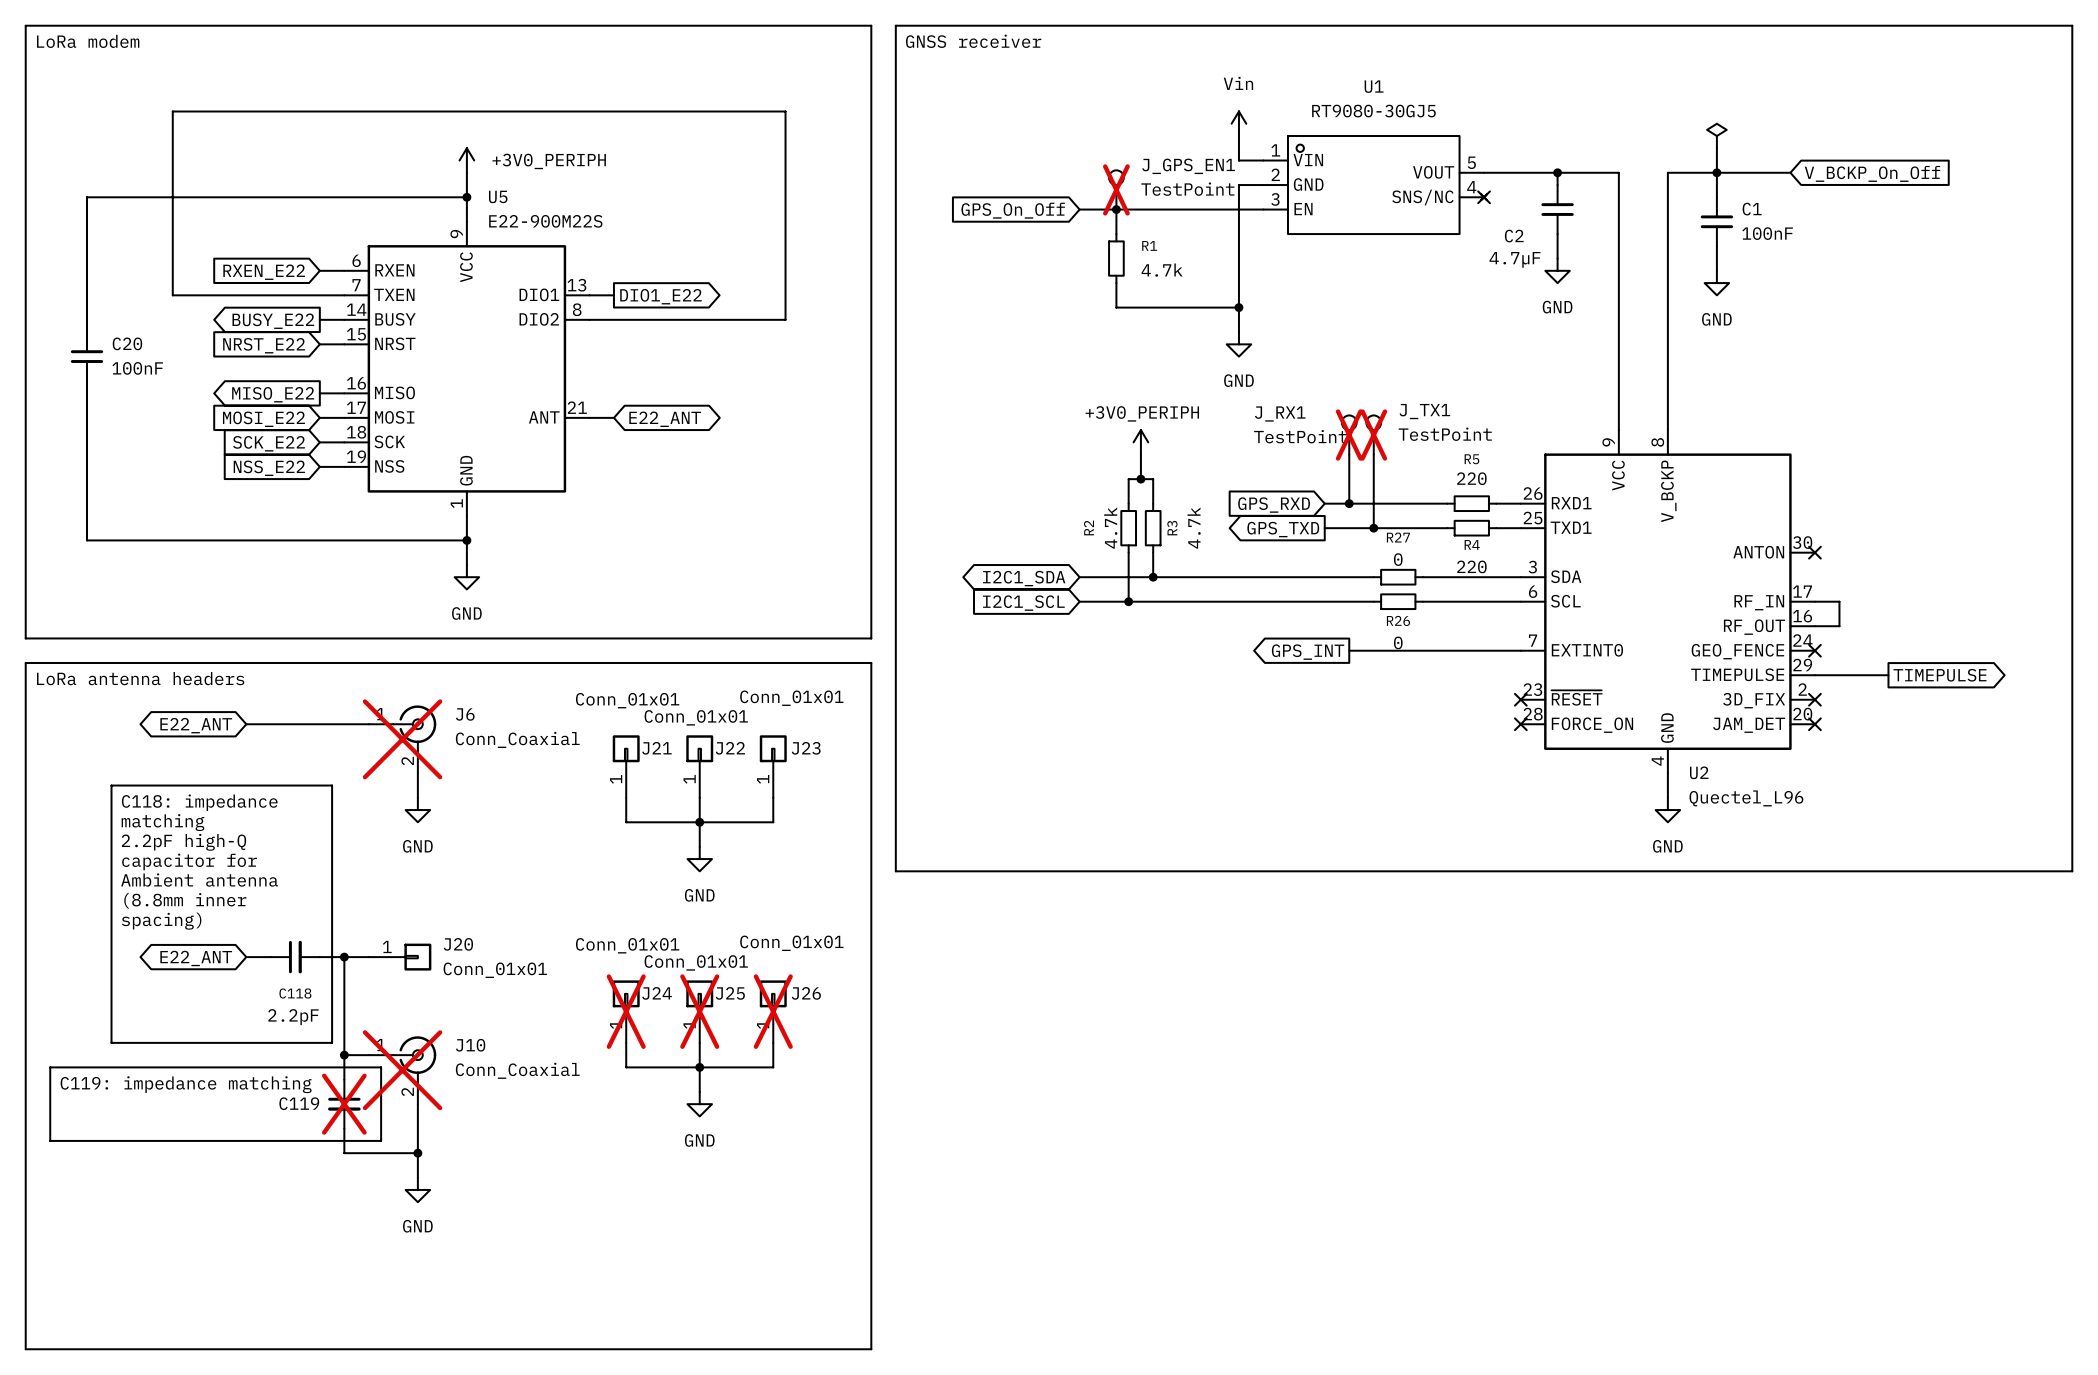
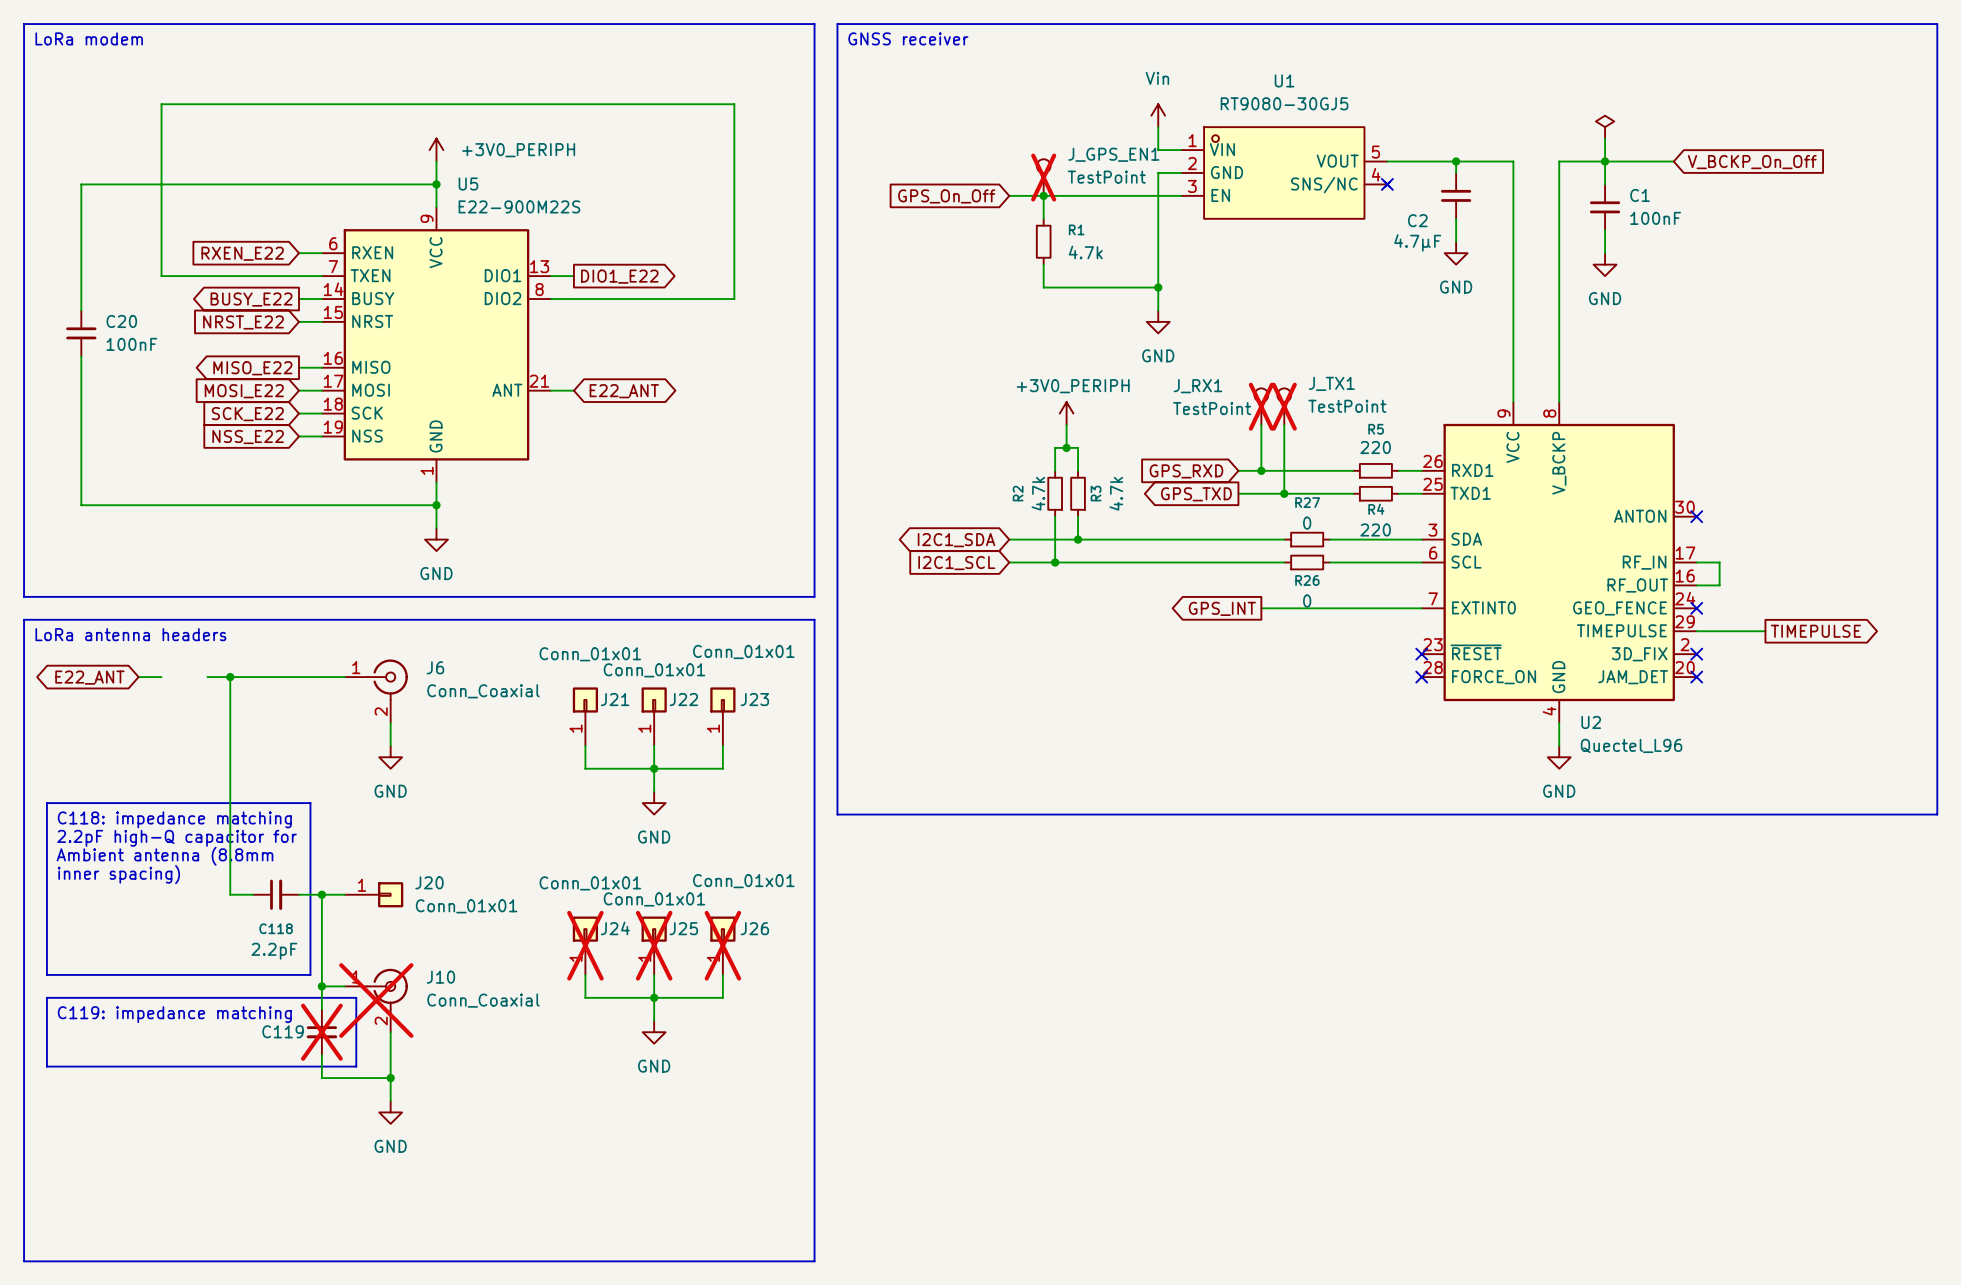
wire: none -> (138, 677) (161, 677)
wire: none -> (207, 677) (230, 677) (230, 894)
junction: none -> (230, 677)
global label position: E22_ANT (196, 725) -> E22_ANT (89, 677)
J6 do-not-place cross: (402, 739) -> none
text: C118: impedance (199, 802) -> none
text: matching (162, 822) -> none
text: 2.2pF high-Q (183, 842) -> none
line: (332, 859) (332, 785) (111, 785) (111, 1042) -> (310, 803) (46, 803) (46, 974) (104, 974)
text: capacitor for (189, 861) -> none
text: none -> C118: impedance matching (174, 819)
text: Ambient antenna (199, 880) -> none
text: none -> 2.2pF high-Q capacitor for (177, 838)
text: (8.8mm inner (185, 900) -> none
text: none -> Ambient antenna (8.8mm (165, 856)
text: spacing) (161, 921) -> inner spacing) (118, 874)
global label: E22_ANT (196, 958) -> none

